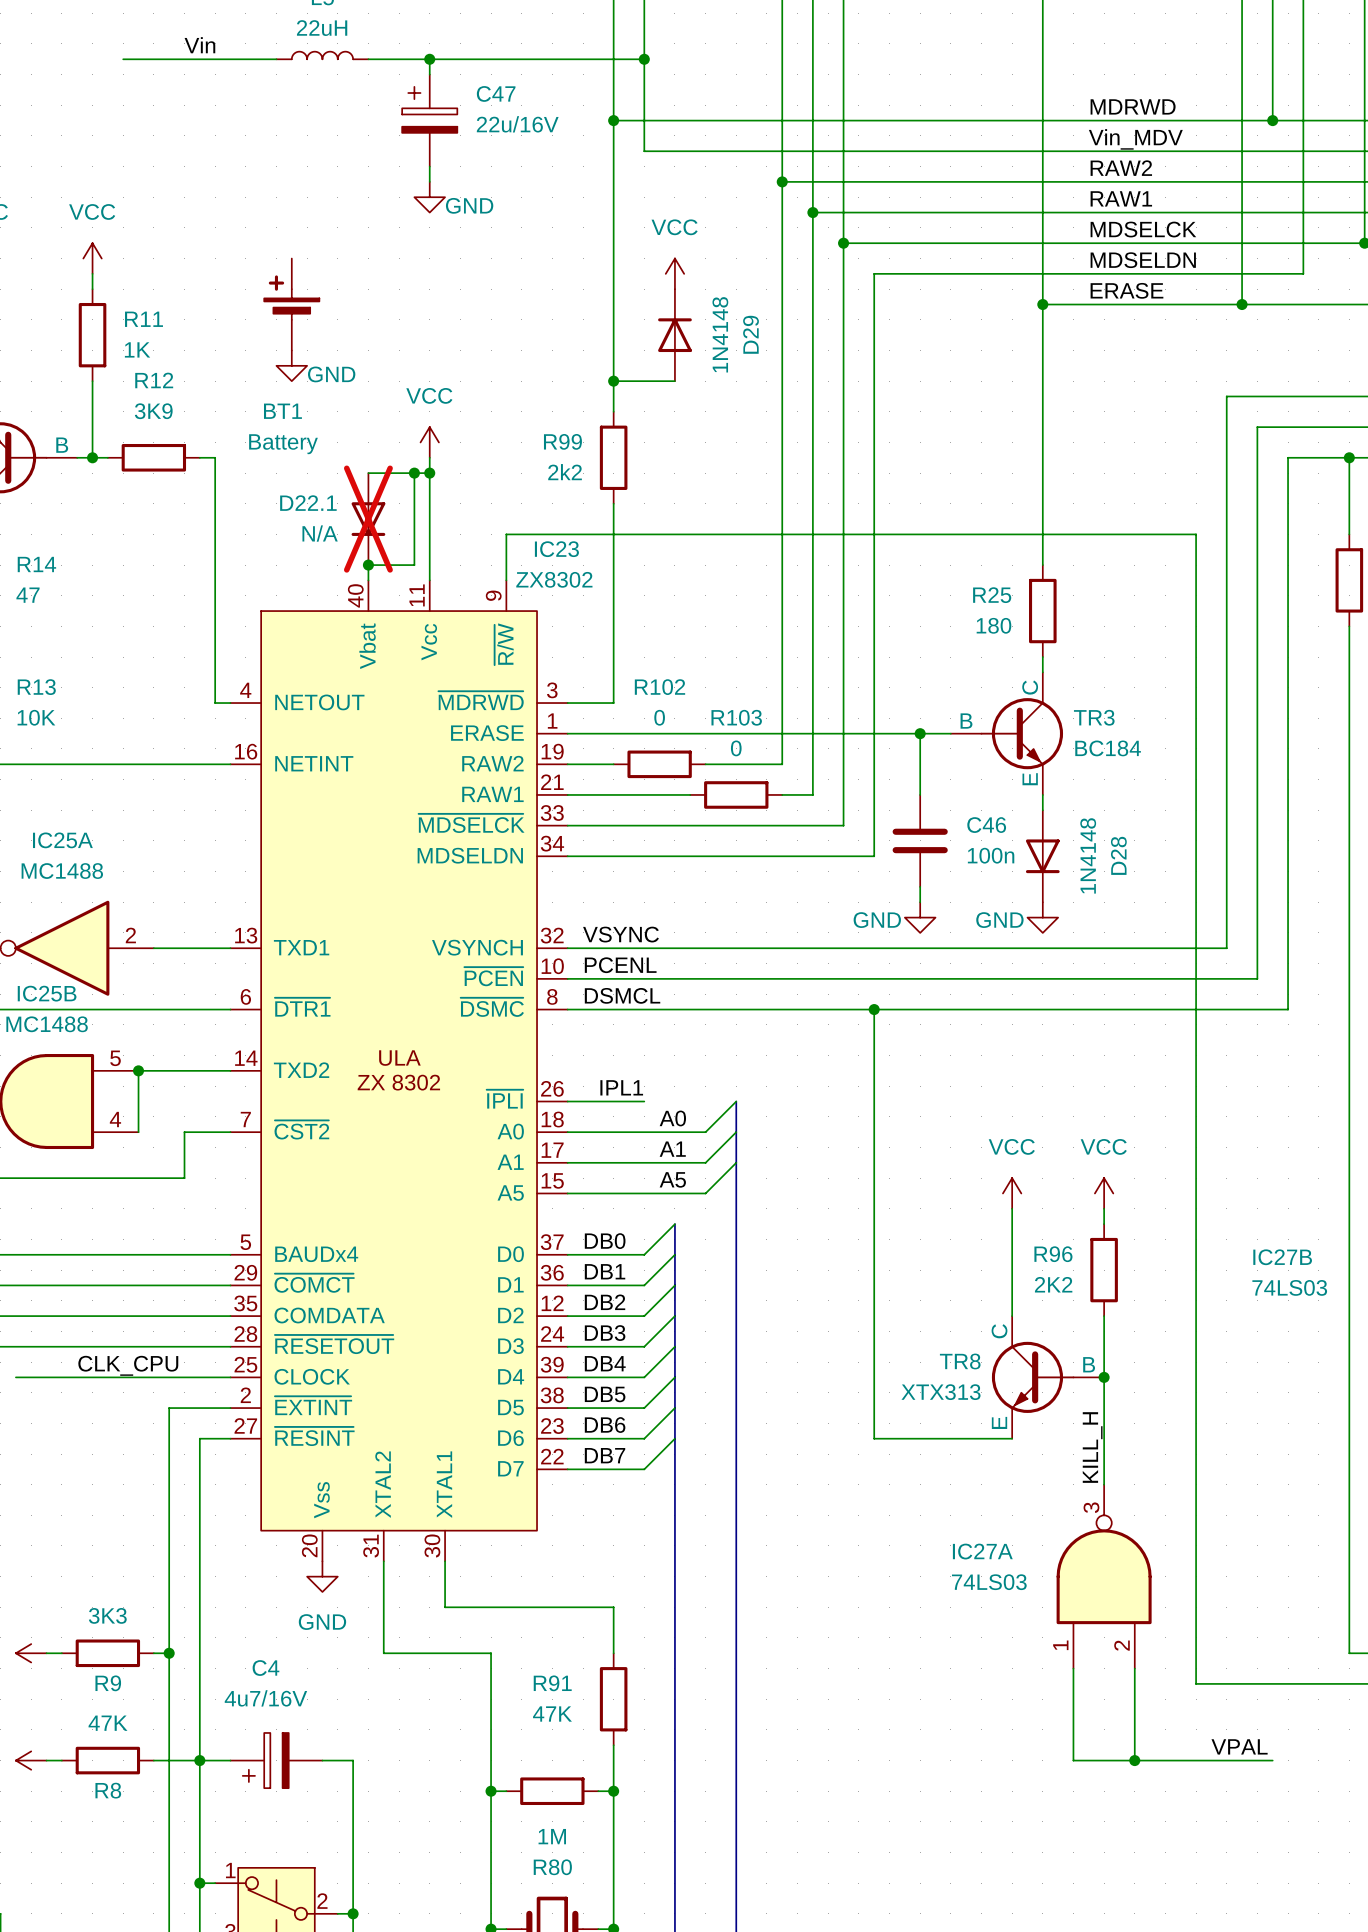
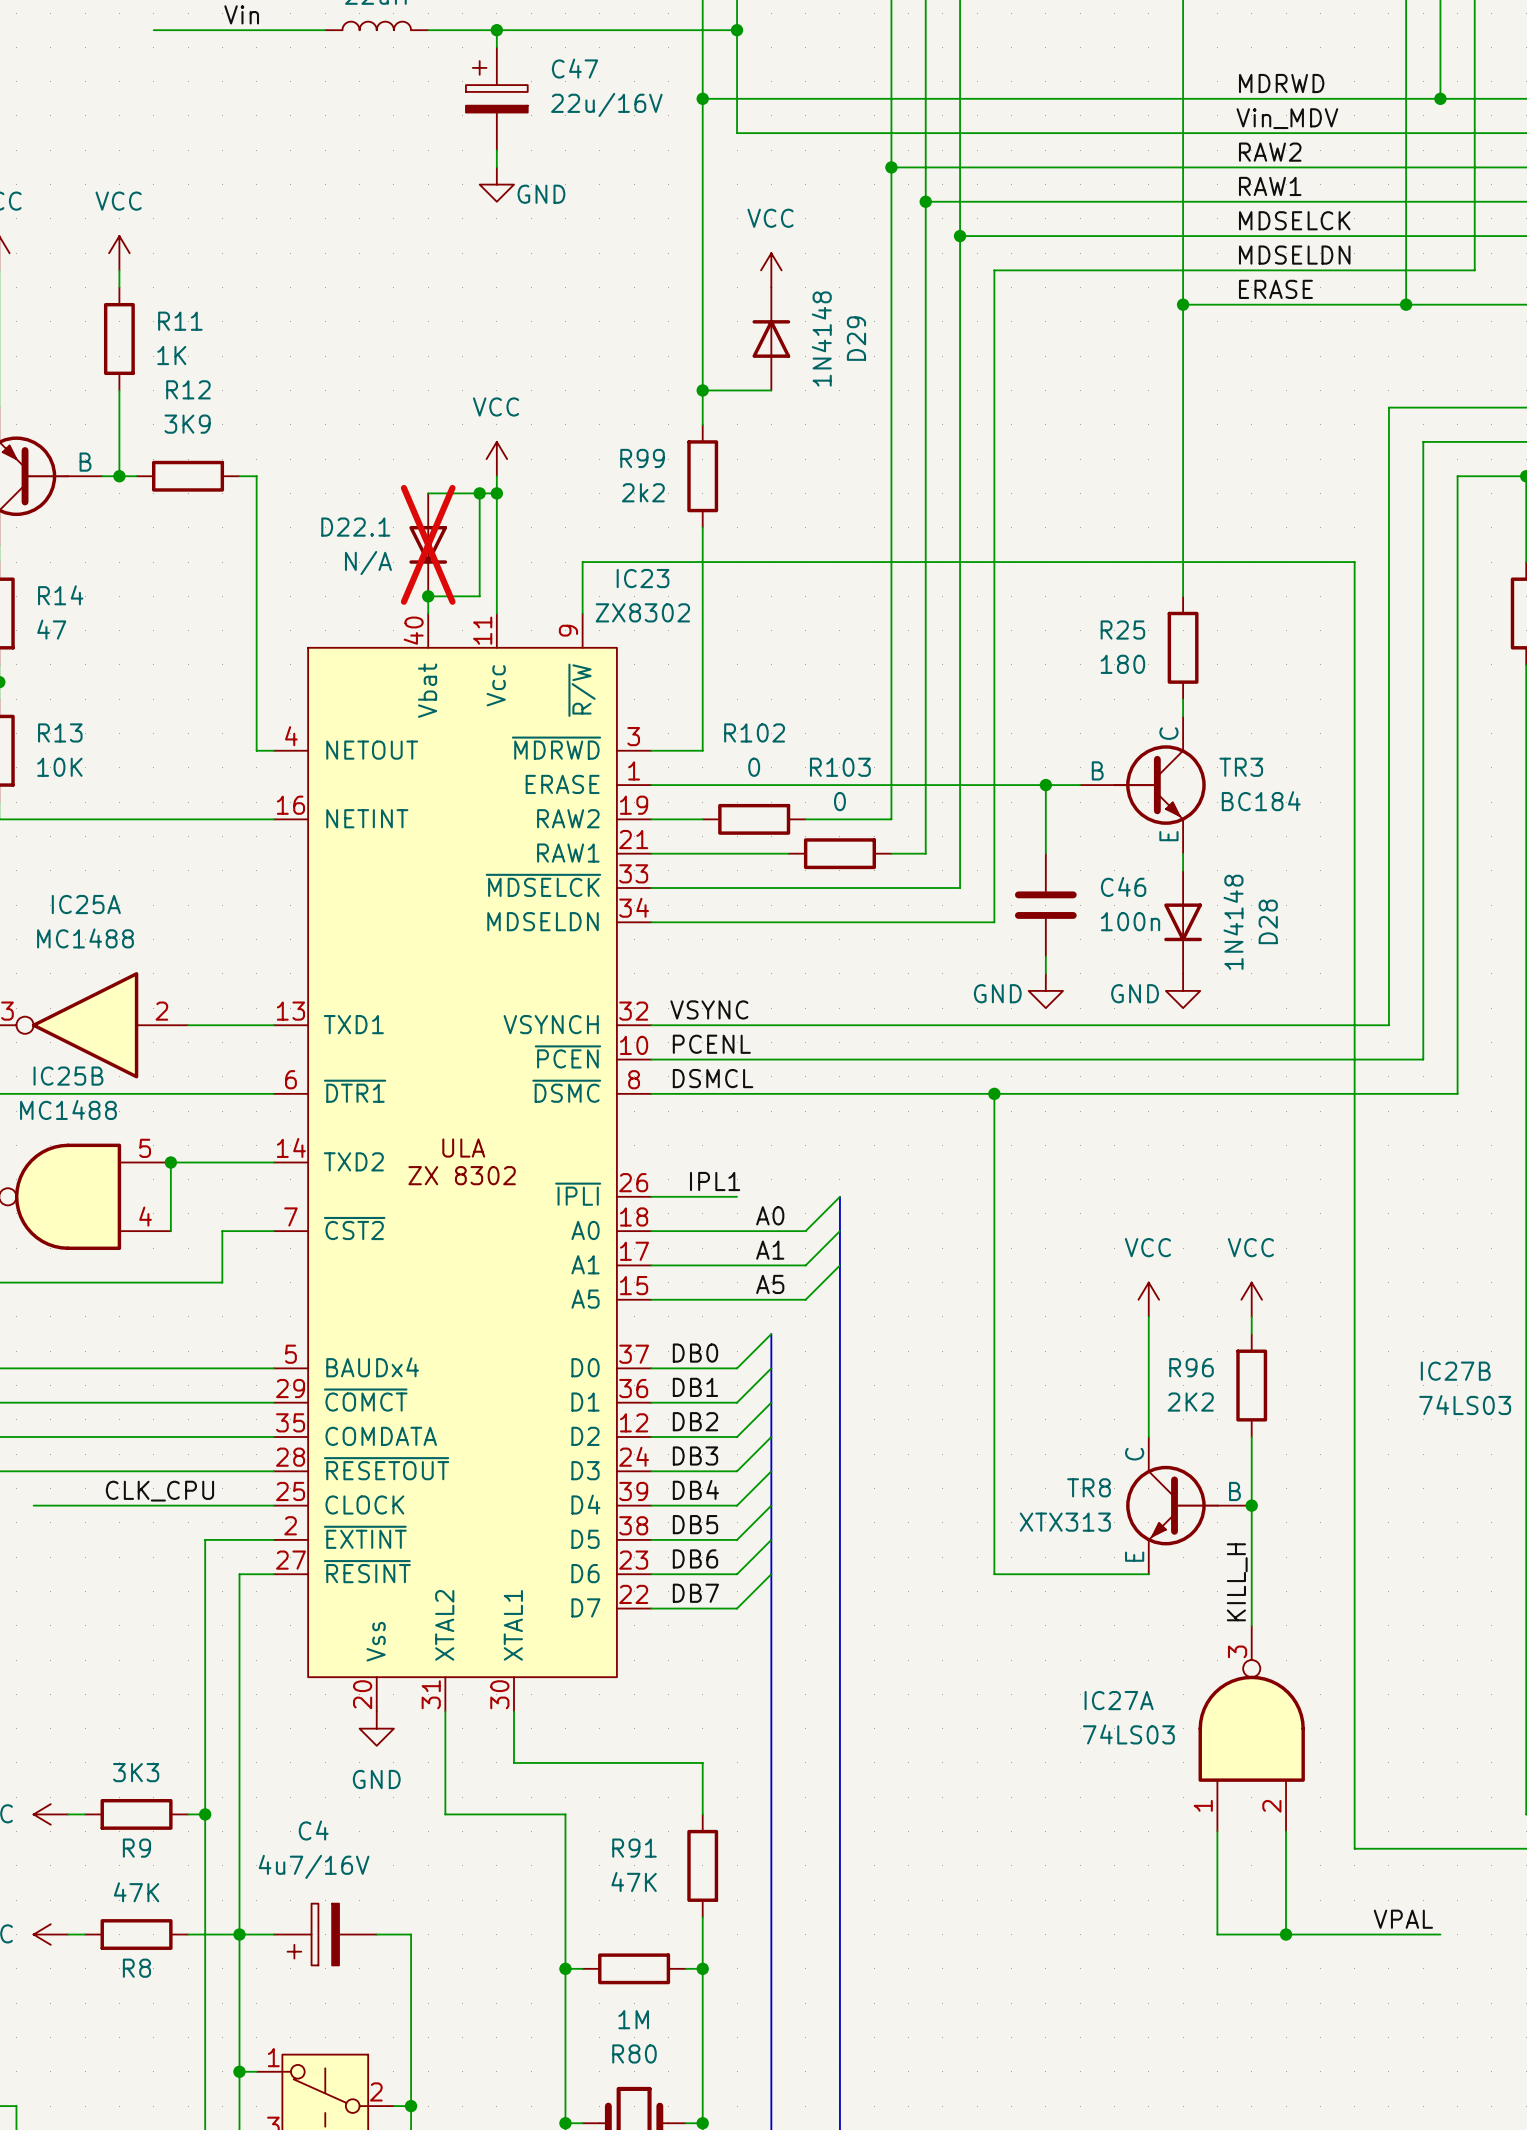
BT1: Battery (291, 304) -> none
power symbol: GND (291, 365) -> none

